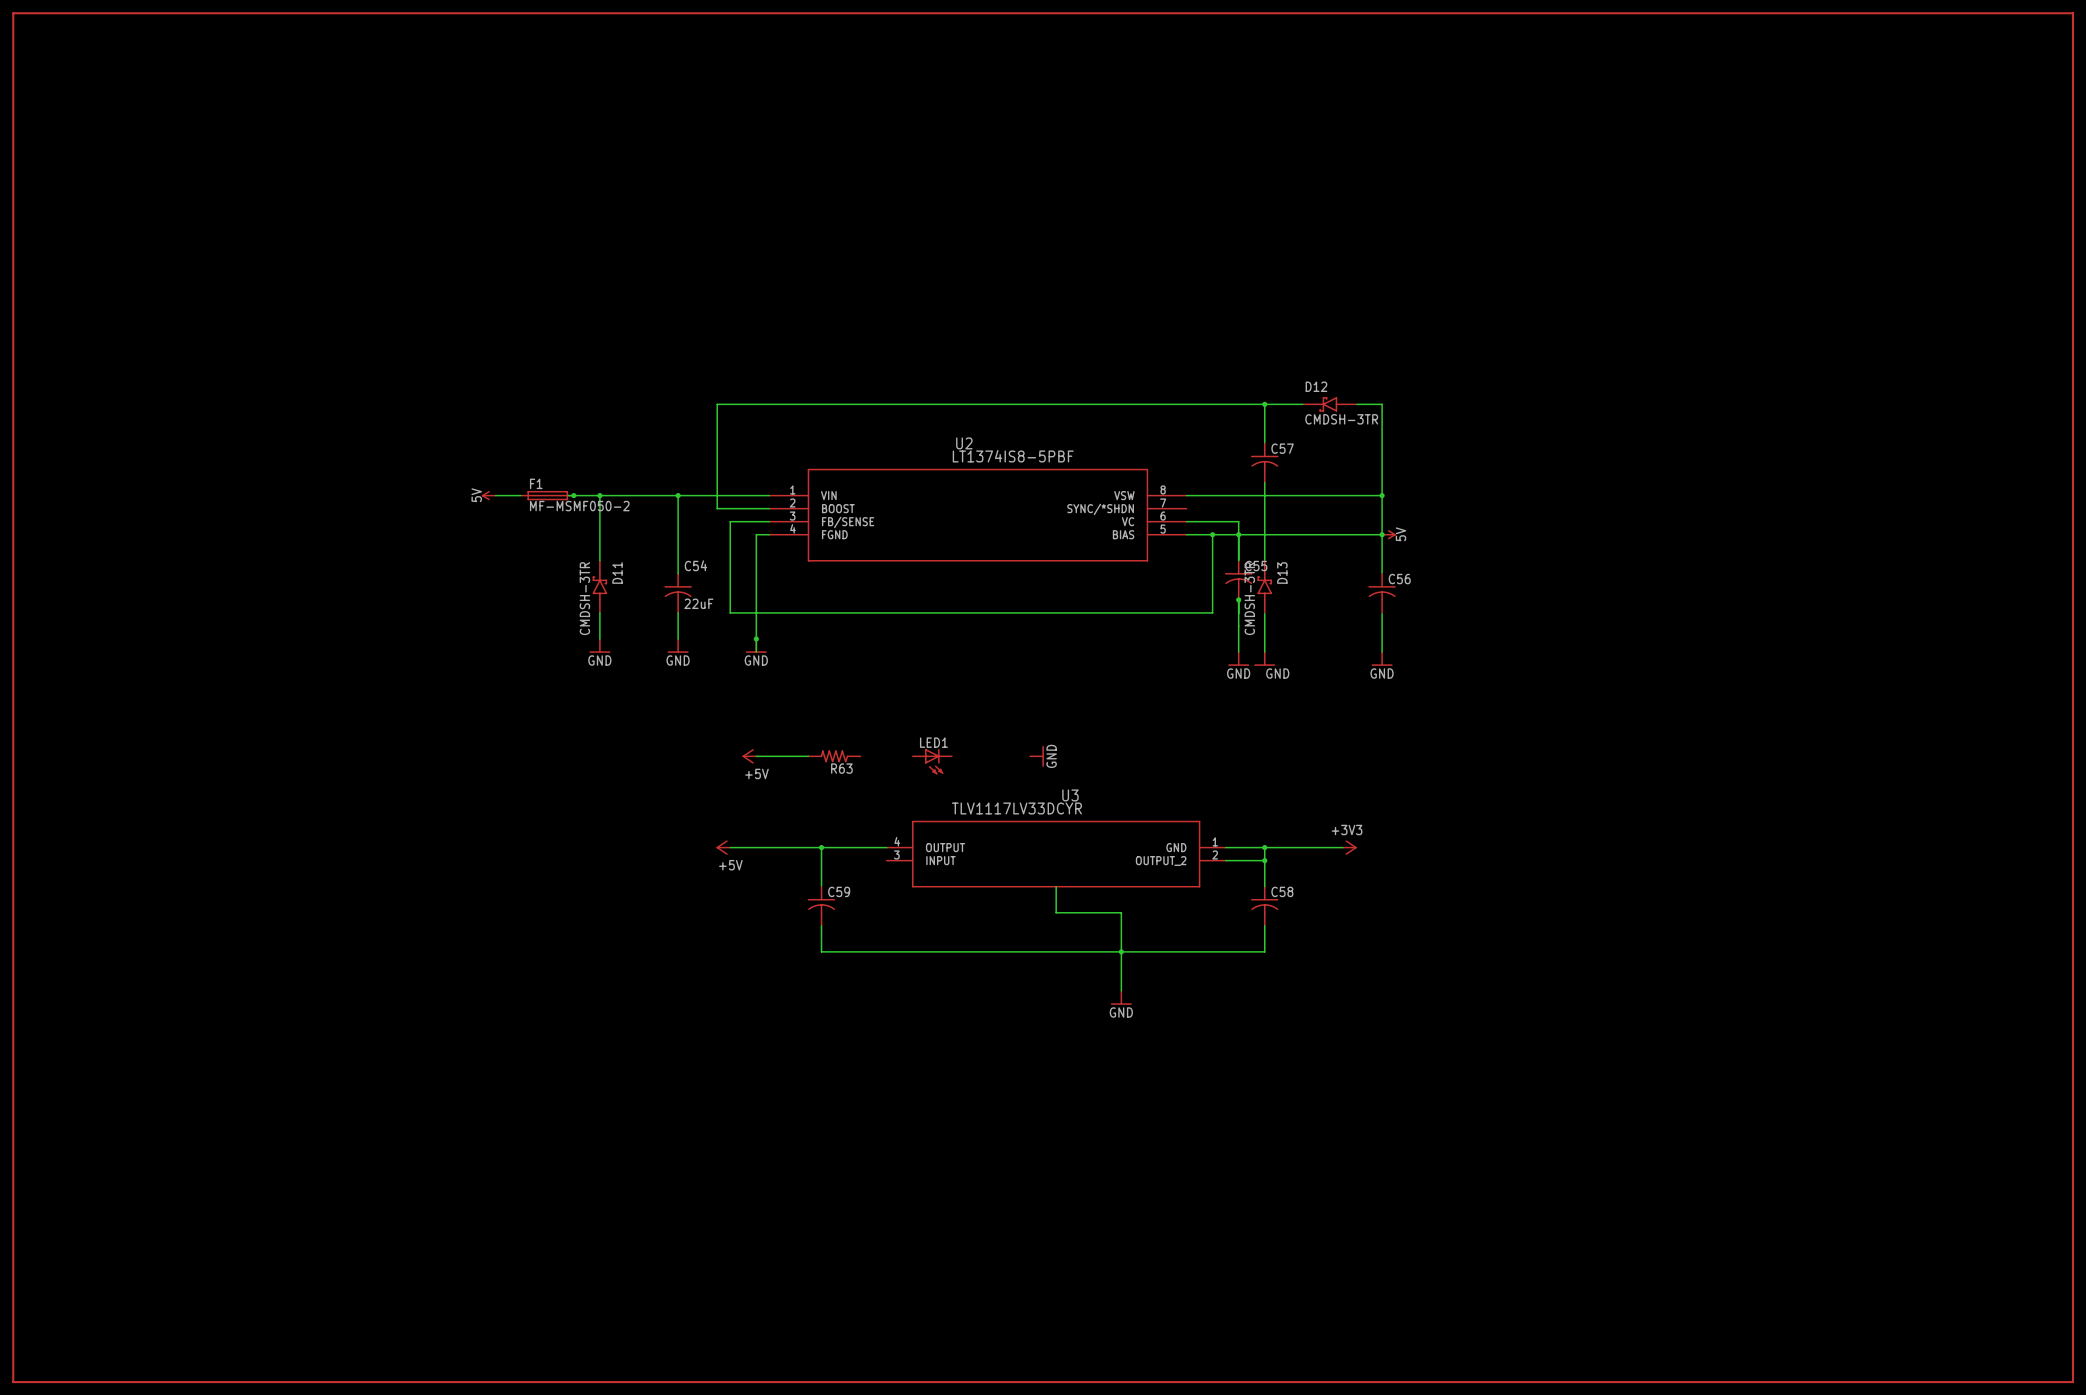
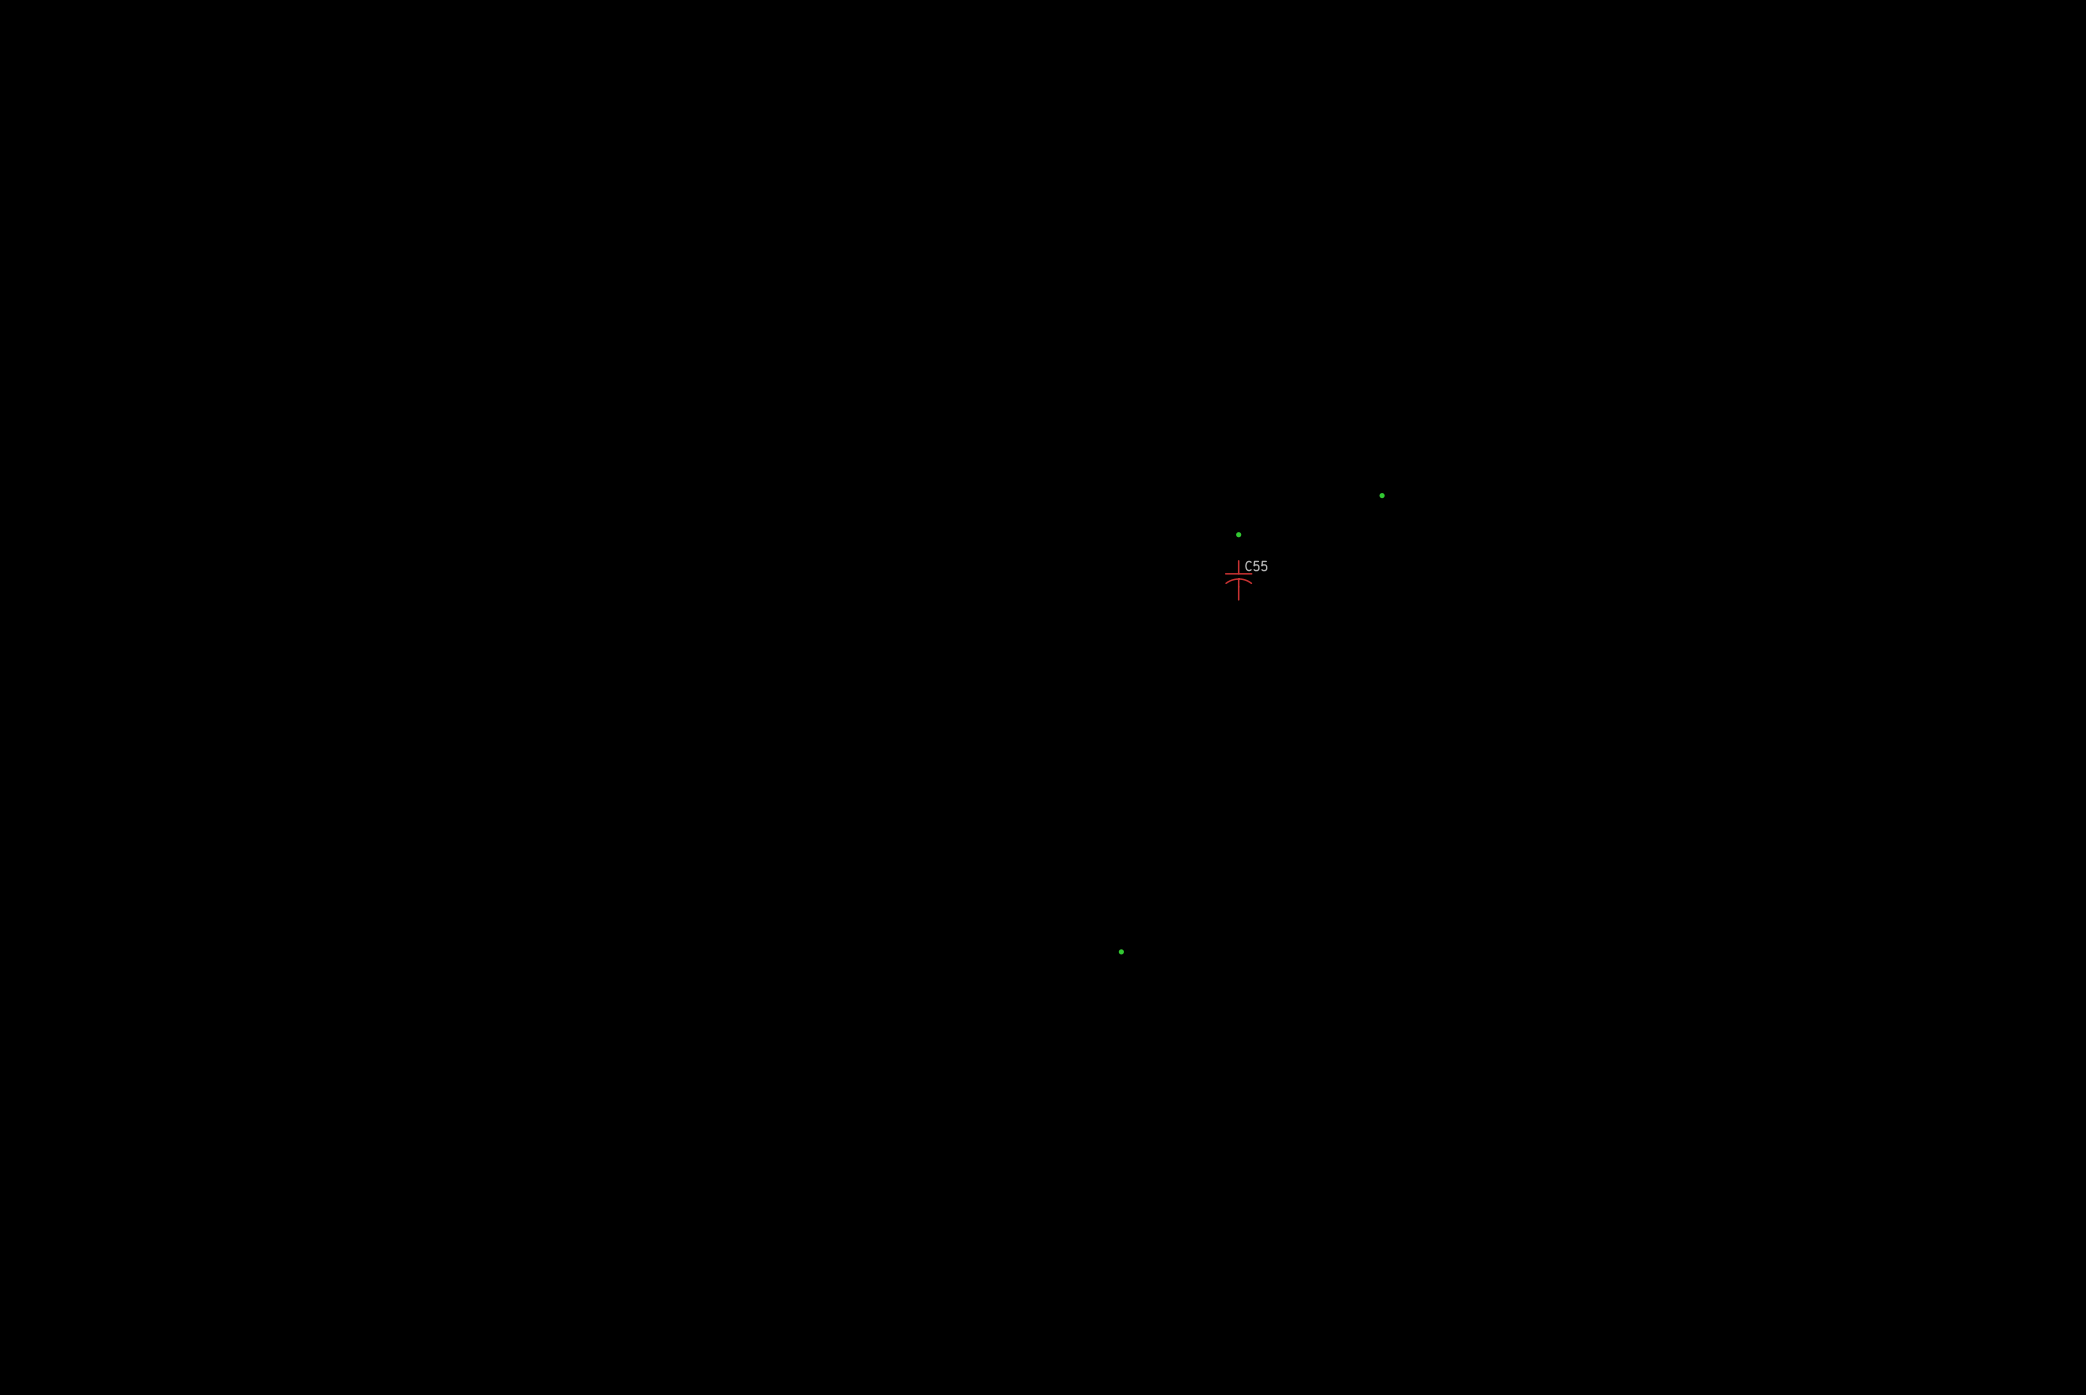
wire: (1264, 404) (1264, 442) -> none
junction: (1264, 404) -> none
wire: (1303, 404) (717, 404) (717, 508) (769, 508) -> none
D12: CMDSH-3TR (1329, 404) -> none
wire: (1356, 404) (1382, 404) (1382, 573) -> none
C57: (1264, 463) -> none
wire: (1264, 482) (1264, 560) -> none
power symbol: 5V (488, 495) -> none
wire: (495, 495) (520, 495) -> none
F1: MF-MSMF050-2 (547, 495) -> none
wire: (568, 495) (769, 495) -> none
junction: (573, 495) -> none
wire: (599, 495) (599, 560) -> none
junction: (599, 495) -> none
wire: (678, 495) (678, 573) -> none
junction: (678, 495) -> none
wire: (1186, 495) (1382, 495) -> none
U2: LT1374IS8-5PBF (977, 515) -> none
wire: (769, 521) (730, 521) (730, 612) (1212, 612) (1212, 534) -> none
wire: (1186, 521) (1238, 521) (1238, 560) -> none
wire: (769, 534) (756, 534) (756, 652) -> none
wire: (1186, 534) (1382, 534) -> none
junction: (1212, 534) -> none
junction: (1382, 534) -> none
power symbol: 5V (1388, 534) -> none
D11: CMDSH-3TR (599, 586) -> none
D13: CMDSH-3TR (1264, 586) -> none
C54: 22uF (678, 593) -> none
C56: (1382, 593) -> none
wire: (1238, 599) (1238, 652) -> none
junction: (1238, 599) -> none
wire: (599, 612) (599, 639) -> none
wire: (678, 612) (678, 639) -> none
wire: (1264, 613) (1264, 652) -> none
wire: (1382, 613) (1382, 652) -> none
junction: (756, 639) -> none
power symbol: GND (599, 645) -> none
power symbol: GND (678, 645) -> none
power symbol: GND (756, 645) -> none
power symbol: GND (1238, 658) -> none
power symbol: GND (1264, 658) -> none
power symbol: GND (1382, 658) -> none
part: (1043, 697) -> none
power symbol: +5V (749, 756) -> none
wire: (756, 756) (808, 756) -> none
R63: (834, 756) -> none
power symbol: GND (1036, 756) -> none
LED1: (932, 761) -> none
power symbol: +5V (723, 847) -> none
wire: (730, 847) (886, 847) -> none
wire: (821, 847) (821, 885) -> none
junction: (821, 847) -> none
wire: (1225, 847) (1342, 847) -> none
wire: (1264, 847) (1264, 886) -> none
junction: (1264, 847) -> none
power symbol: +3V3 (1349, 847) -> none
U3: TLV1117LV33DCYR (1056, 854) -> none
wire: (1225, 860) (1264, 860) -> none
junction: (1264, 860) -> none
wire: (1056, 886) (1056, 912) (1121, 912) (1121, 990) -> none
C59: (821, 906) -> none
C58: (1264, 906) -> none
wire: (821, 925) (821, 938) -> none
wire: (1264, 925) (1264, 951) (821, 951) (821, 939) -> none
power symbol: GND (1121, 997) -> none

